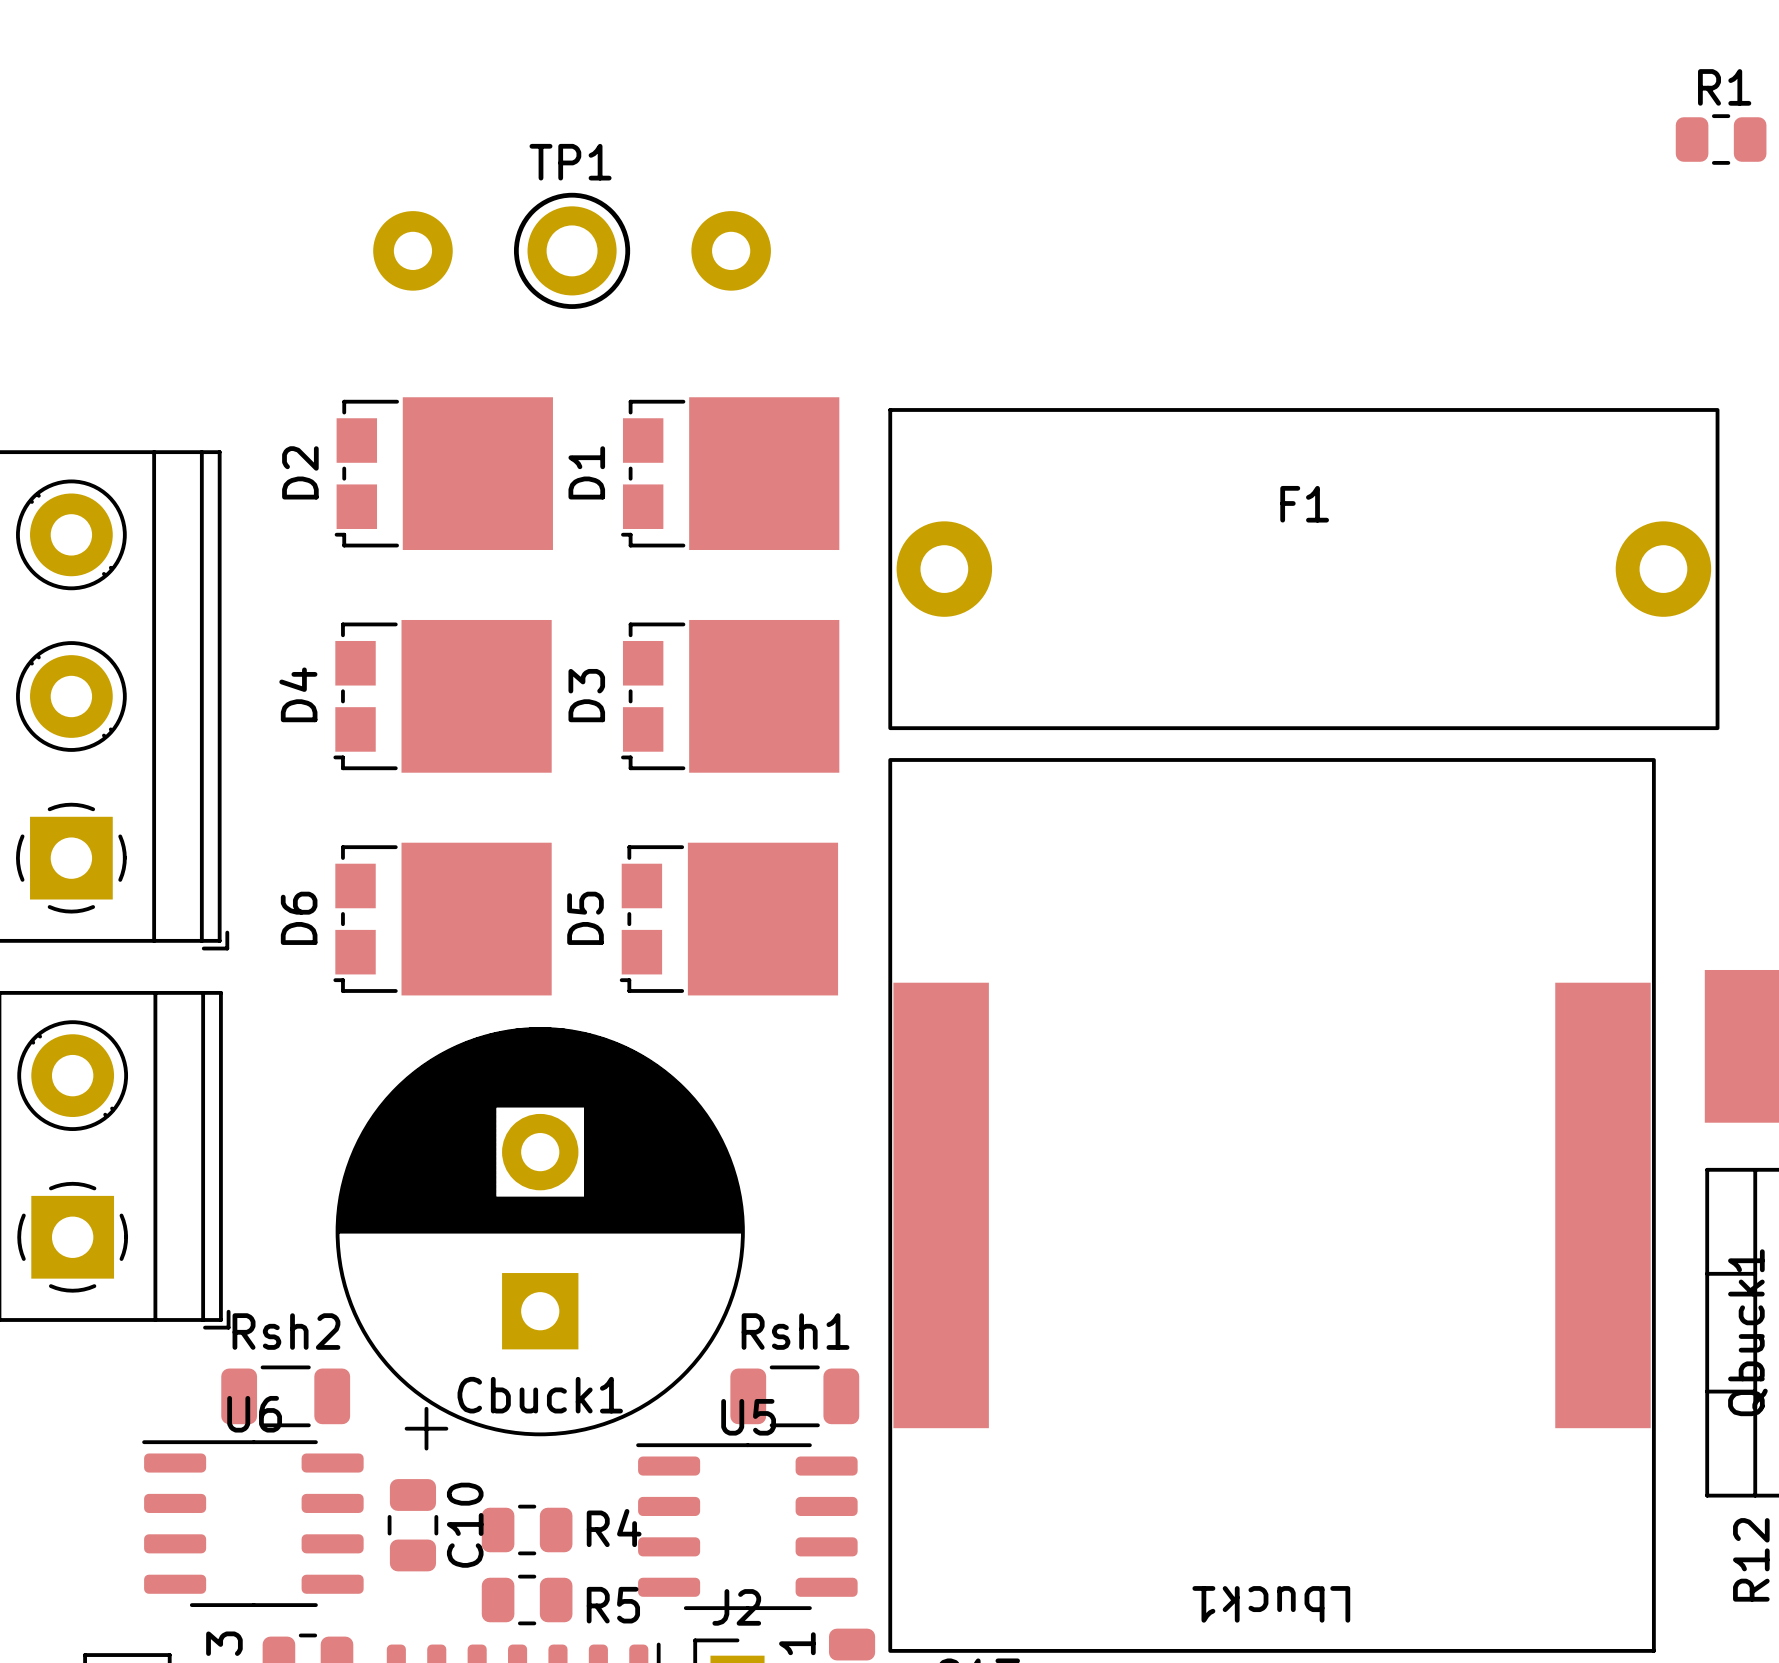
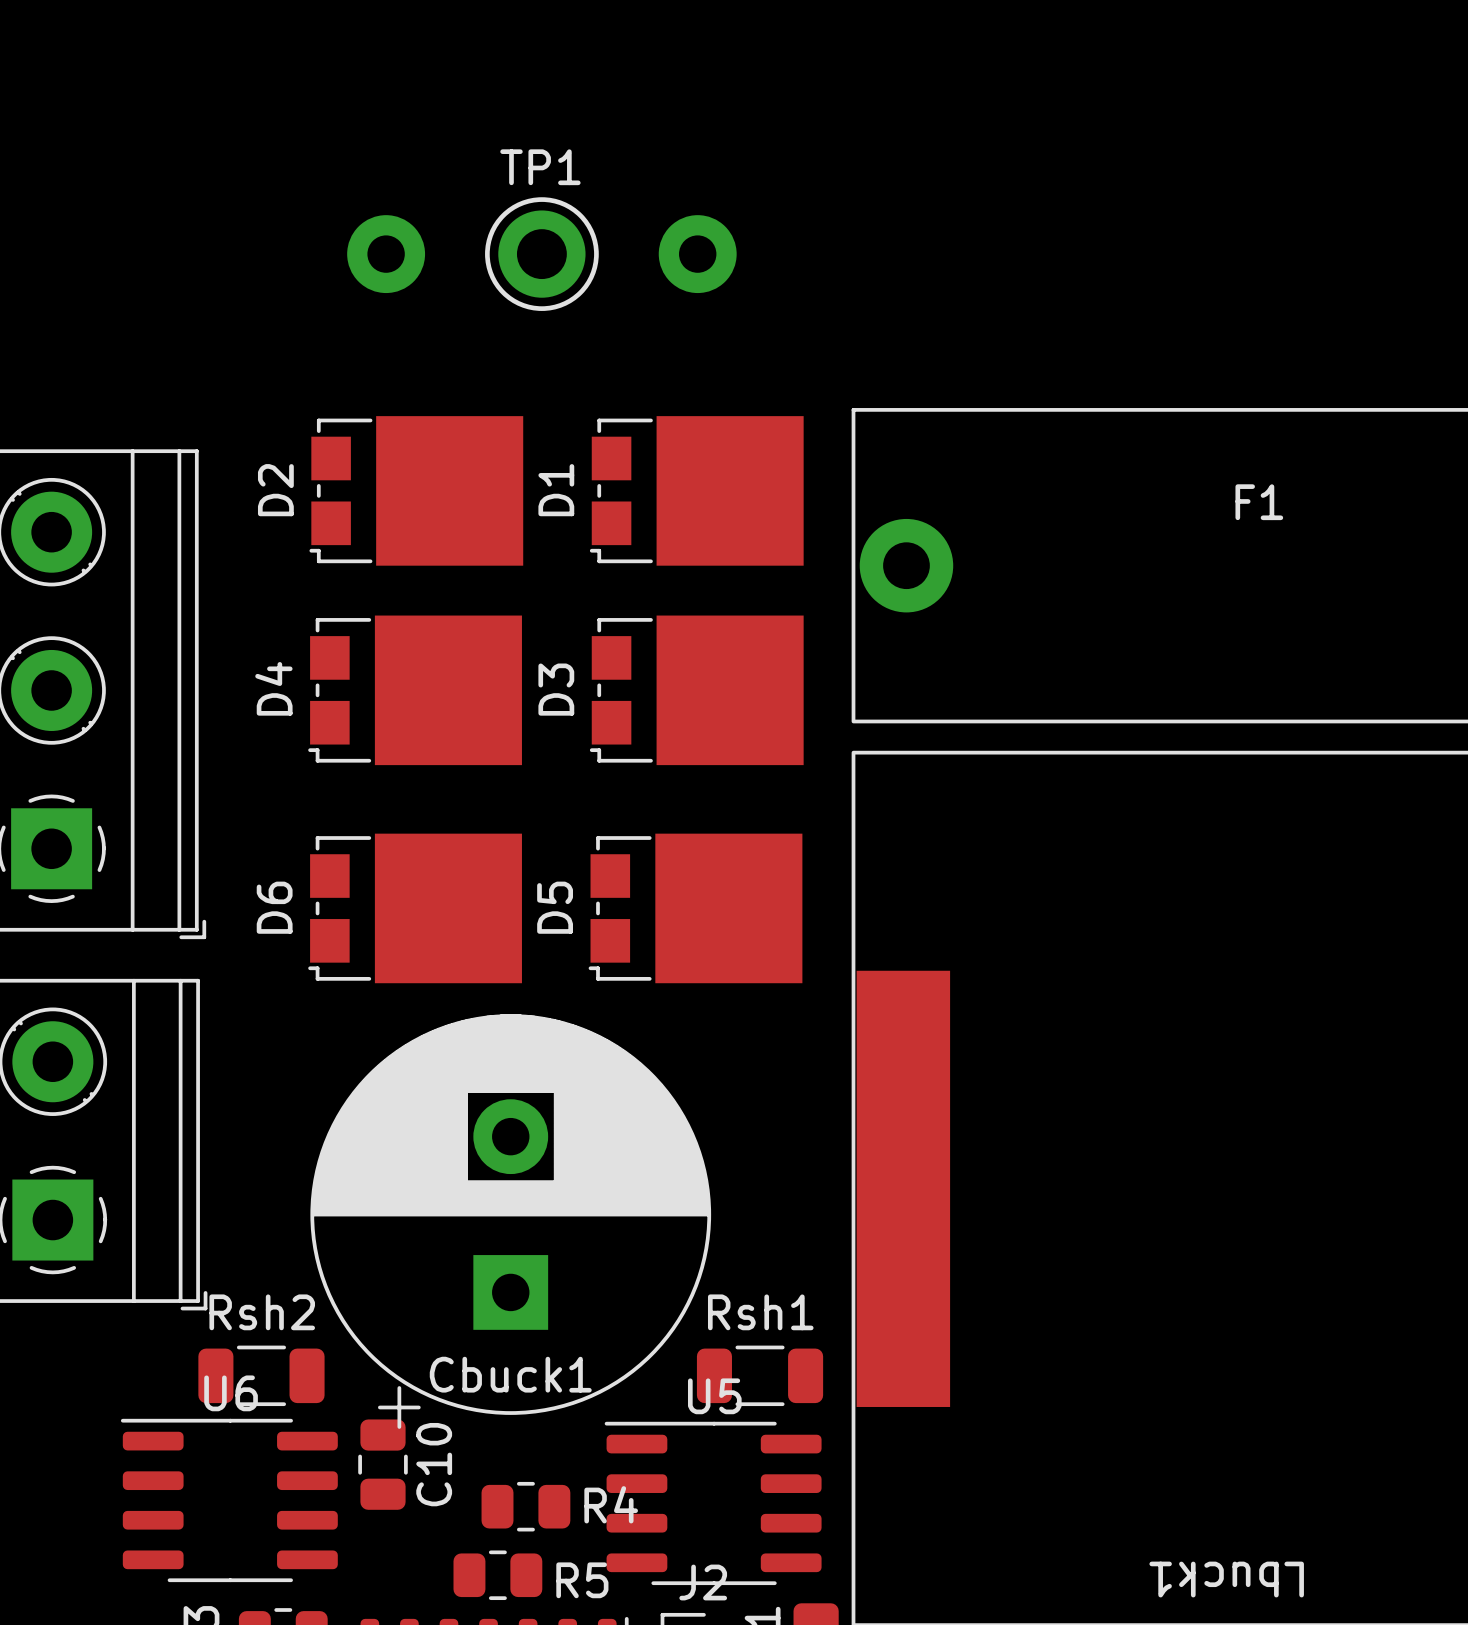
D2 position: (443, 473) -> (416, 490)
D1 position: (730, 473) -> (696, 490)
C10 position: (412, 1525) -> (382, 1464)
R4 position: (527, 1529) -> (525, 1506)

